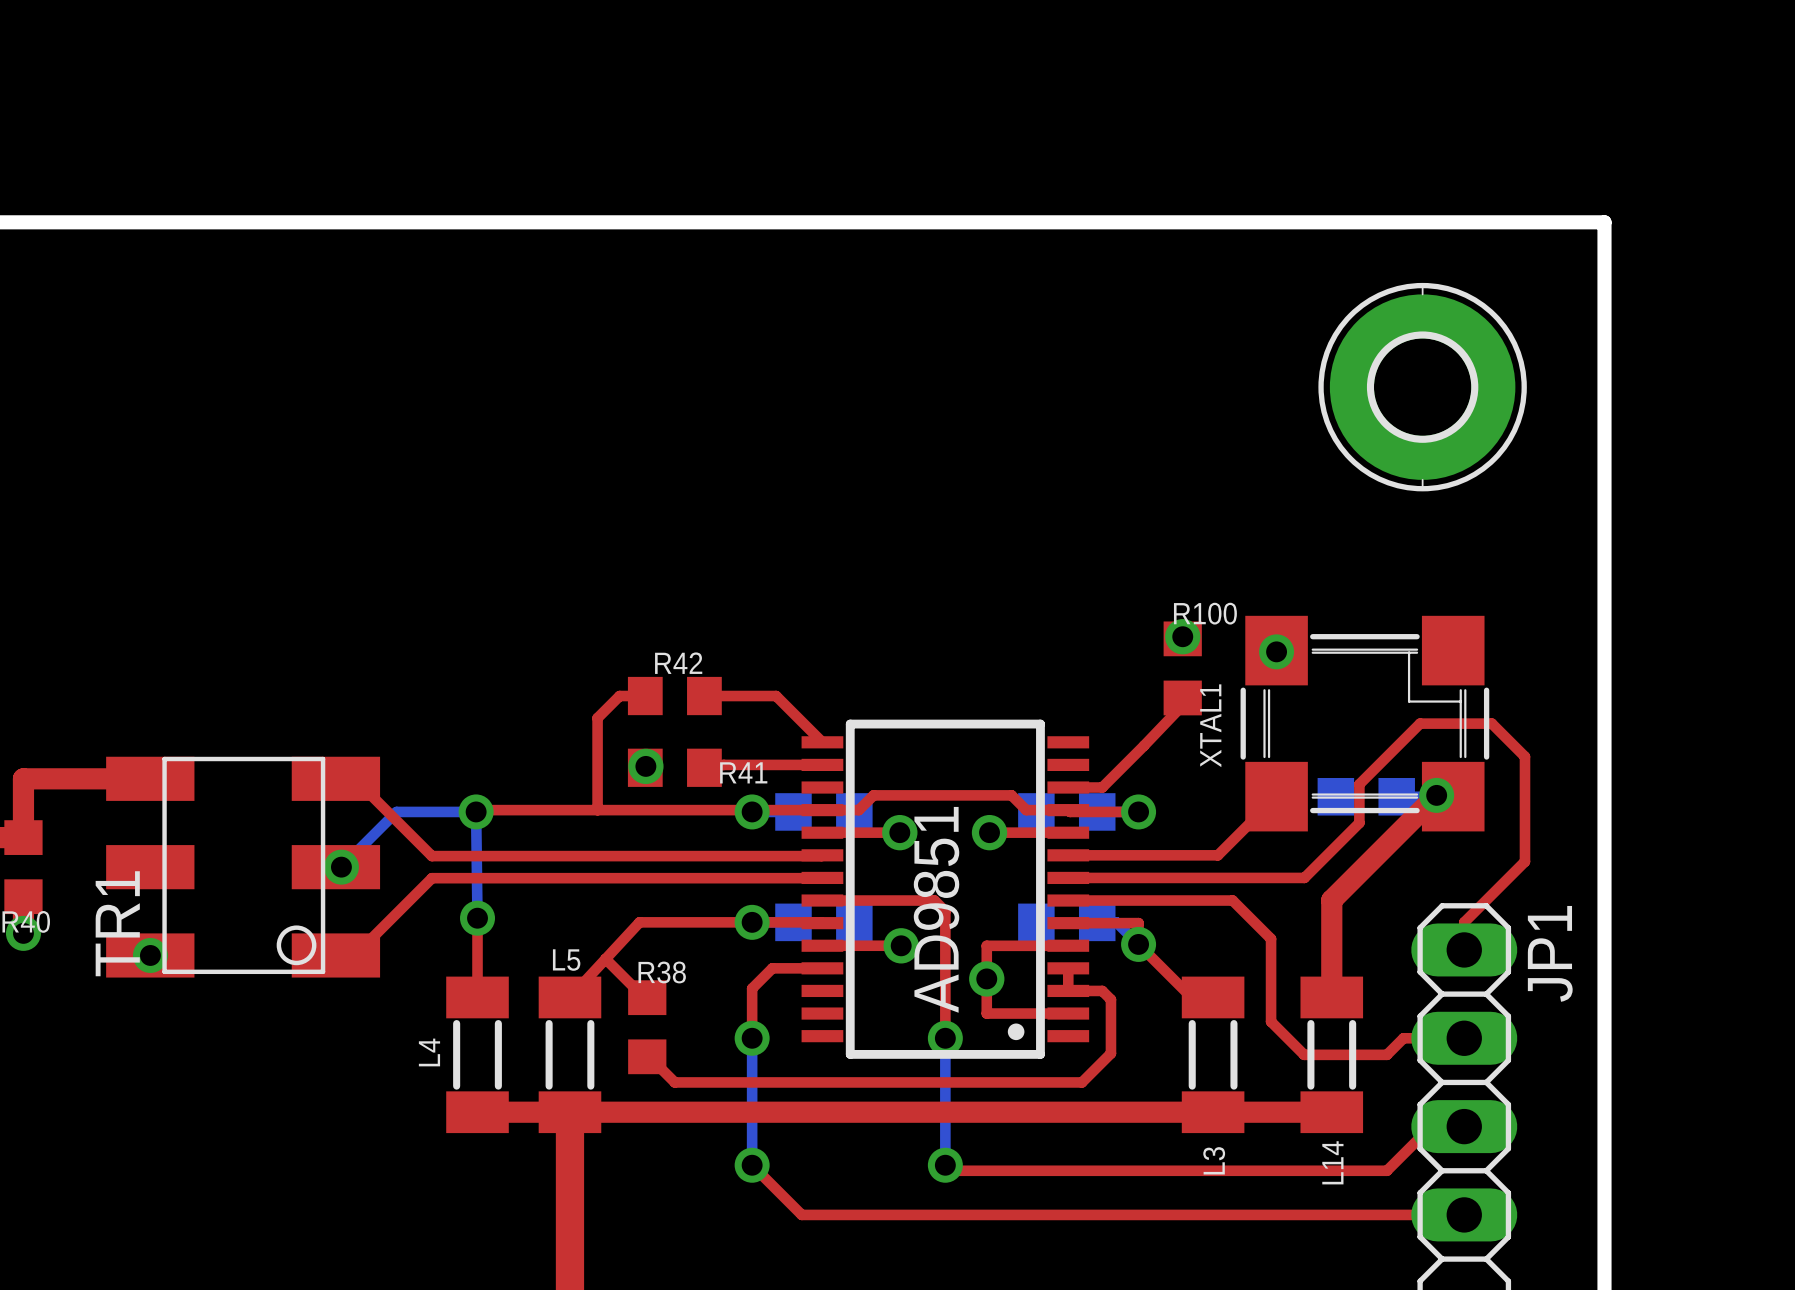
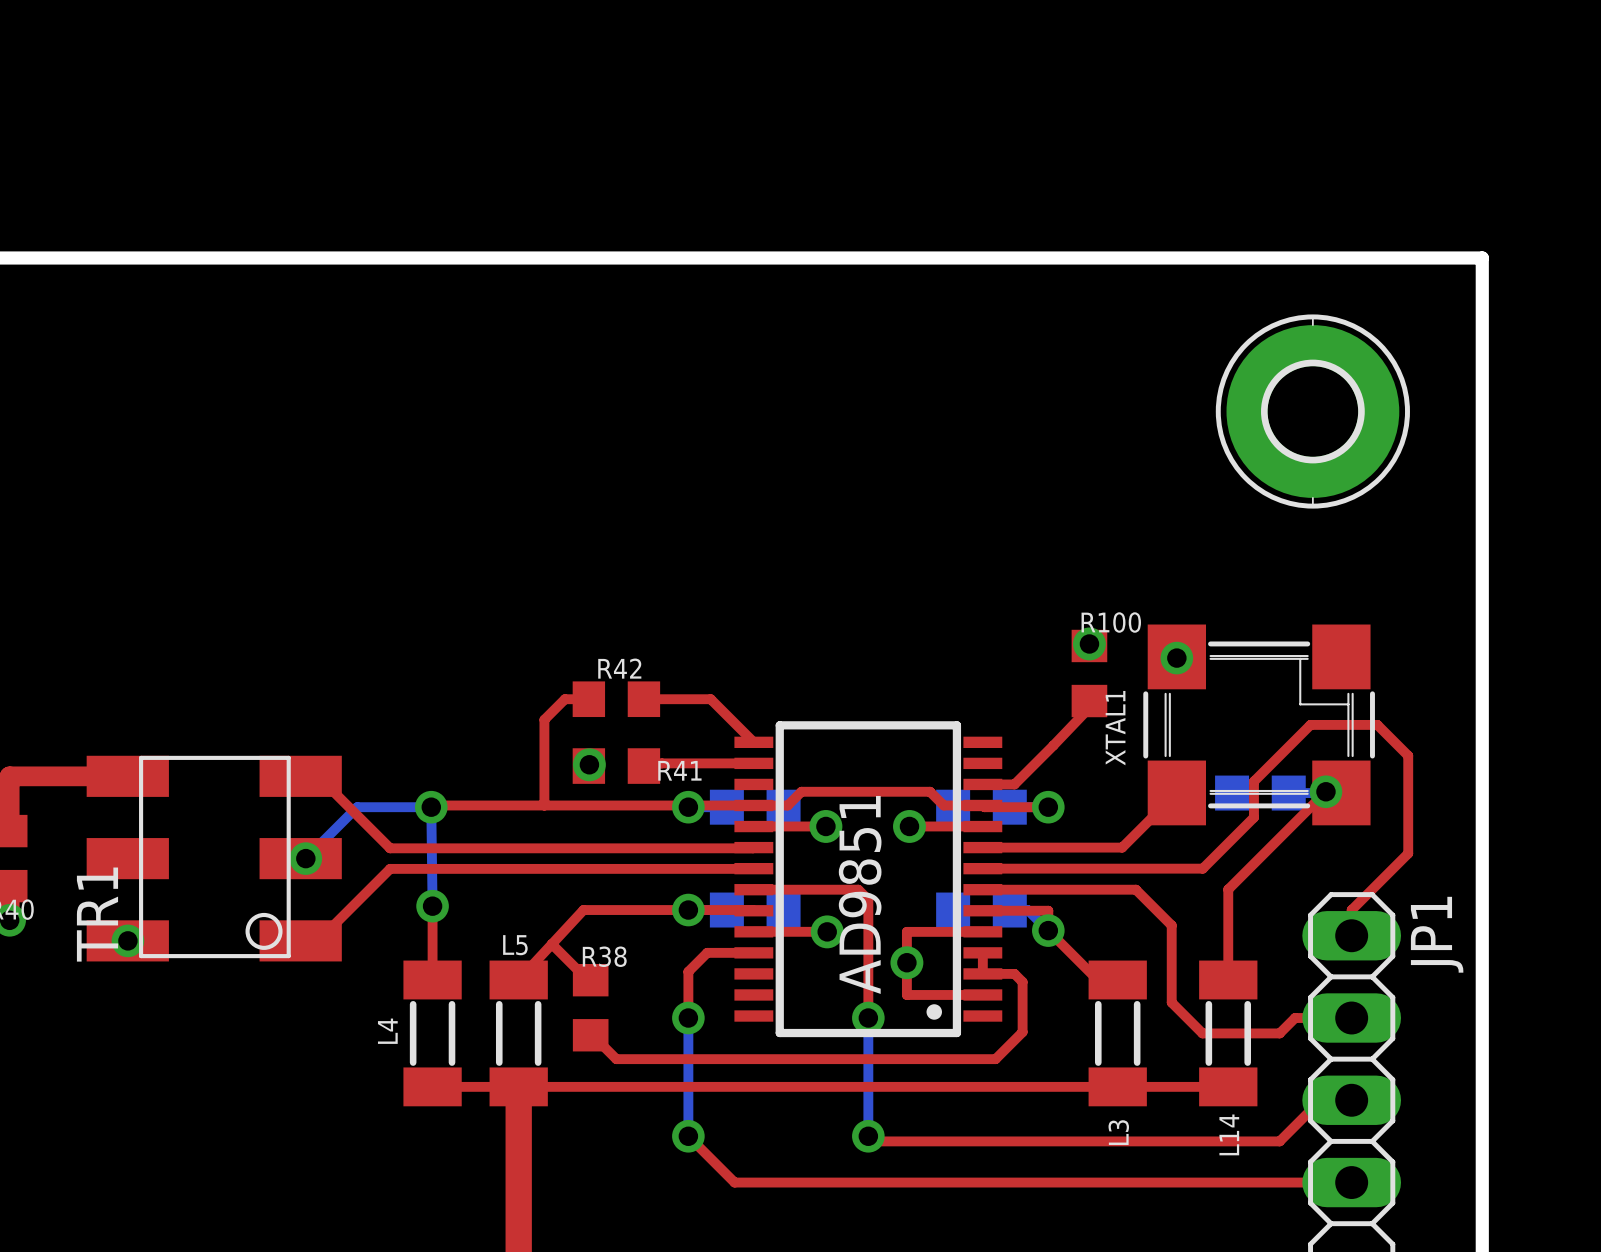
top track width: thick (1436, 795) (1331, 900) (1331, 997) -> thin (1325, 791) (1228, 889) (1228, 979)
top track width: thick (477, 1112) (1331, 1112) -> thin (432, 1086) (1228, 1086)

